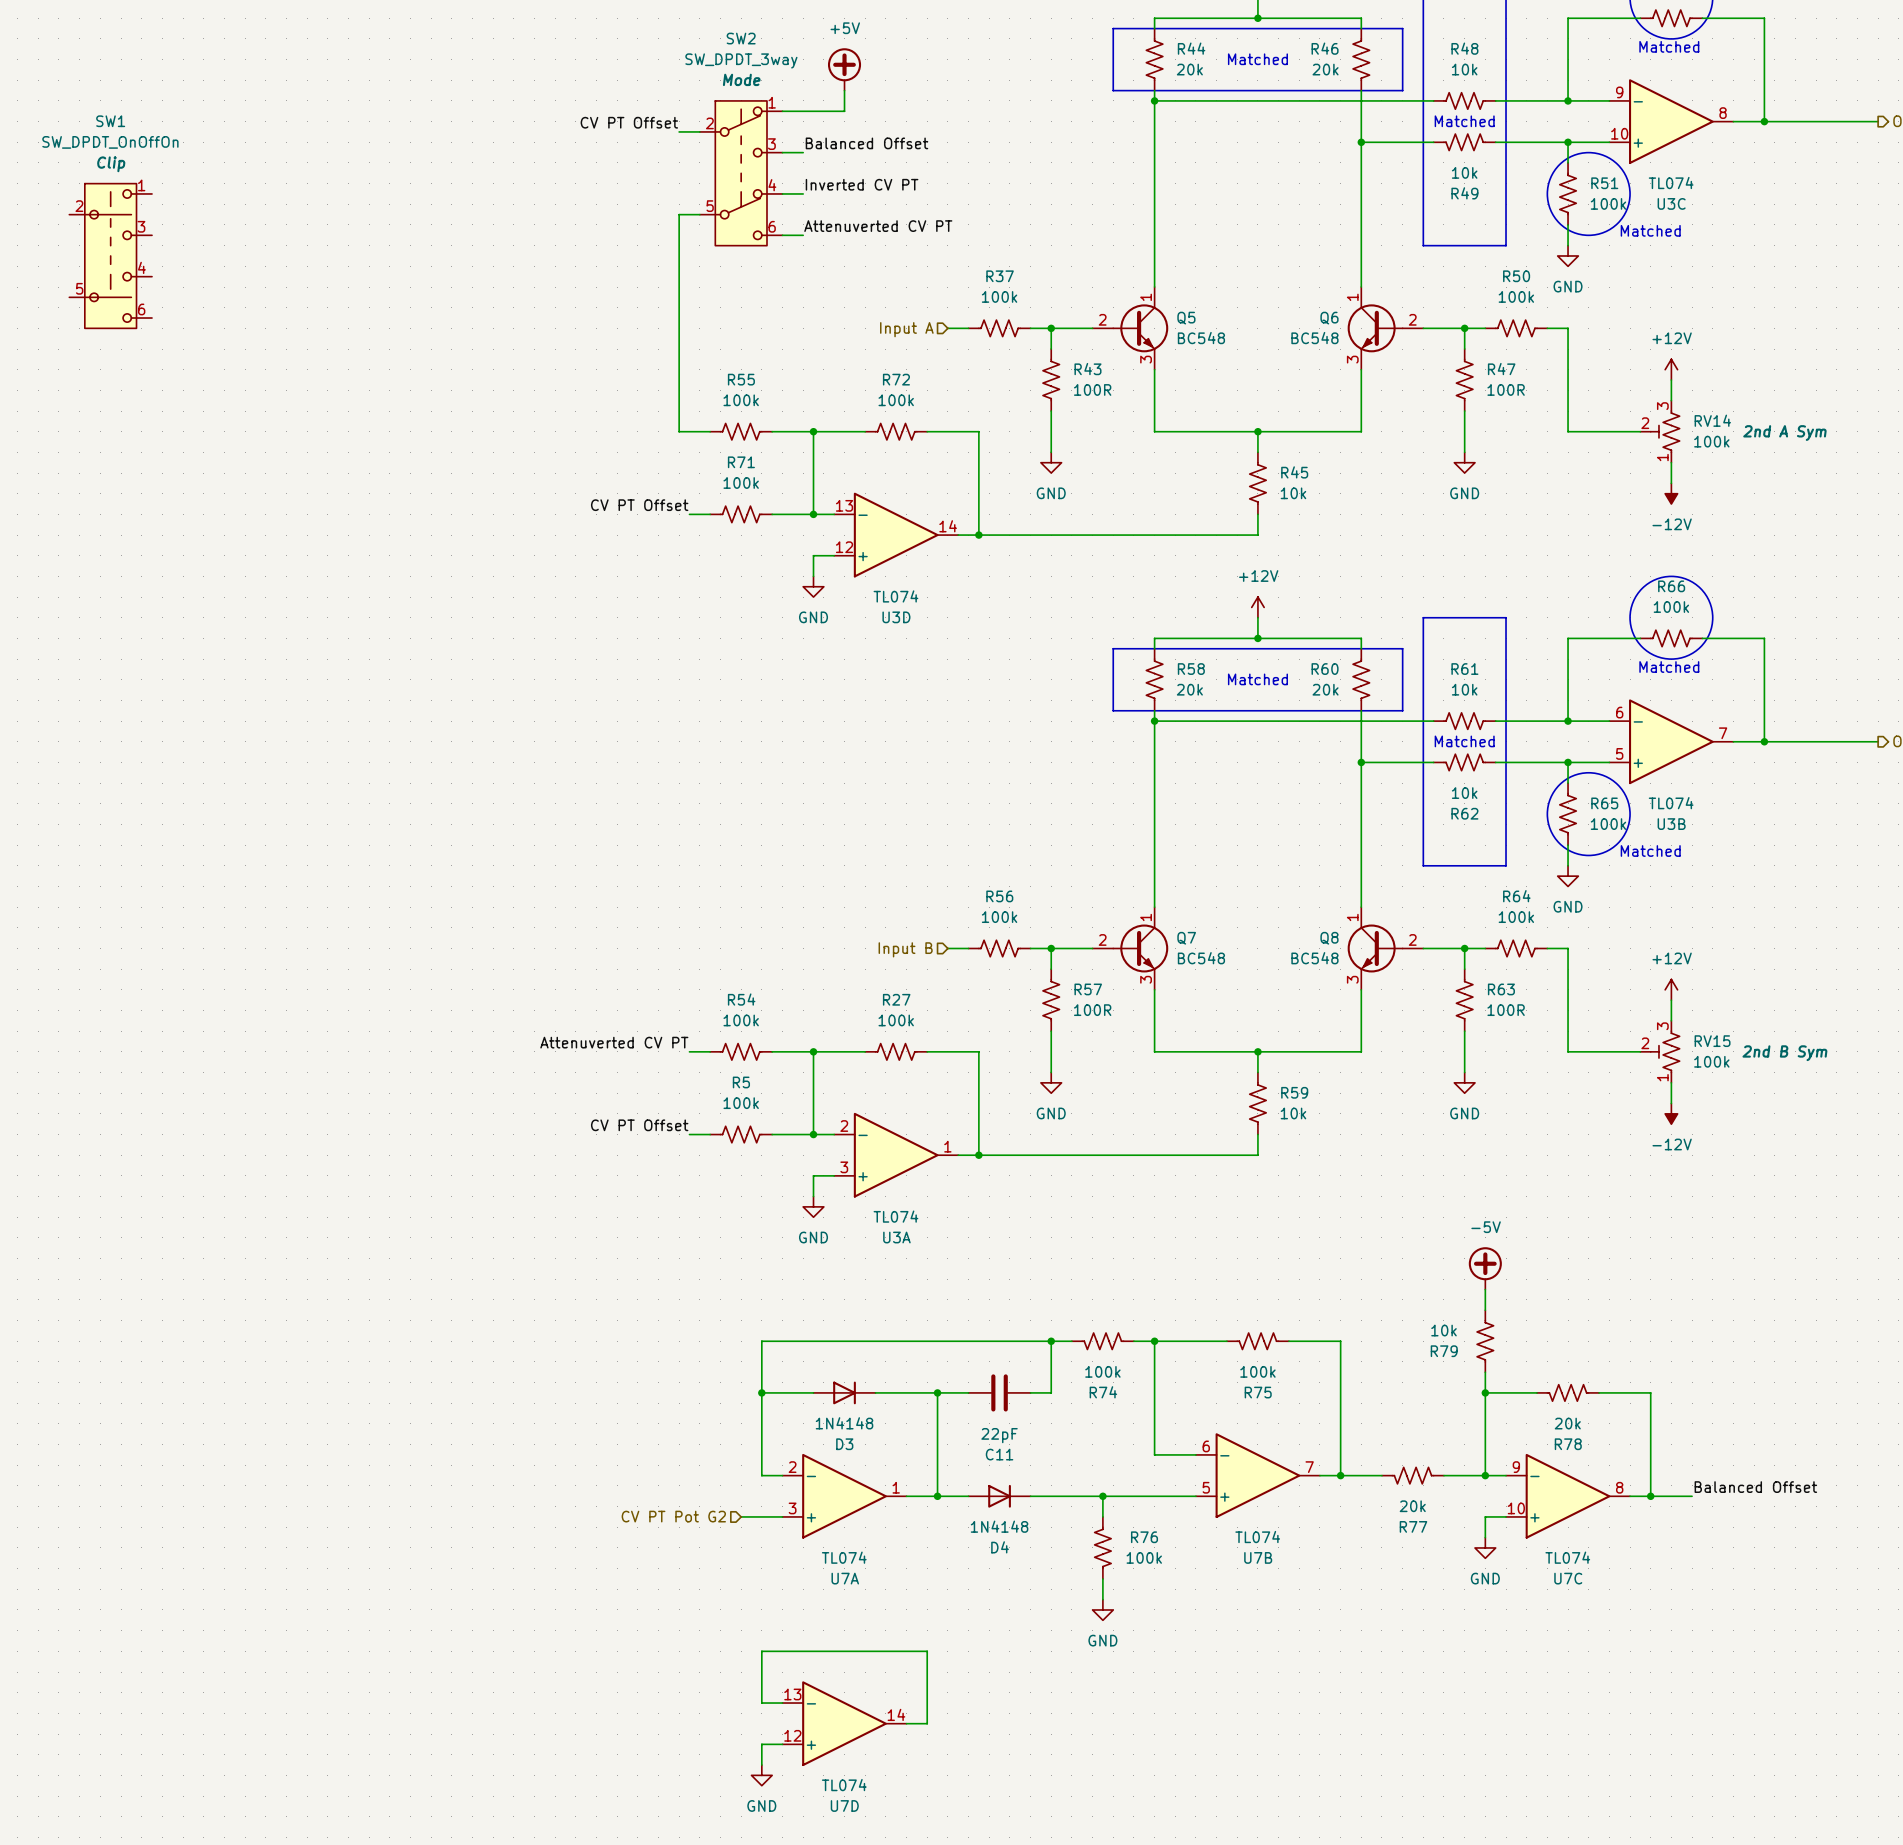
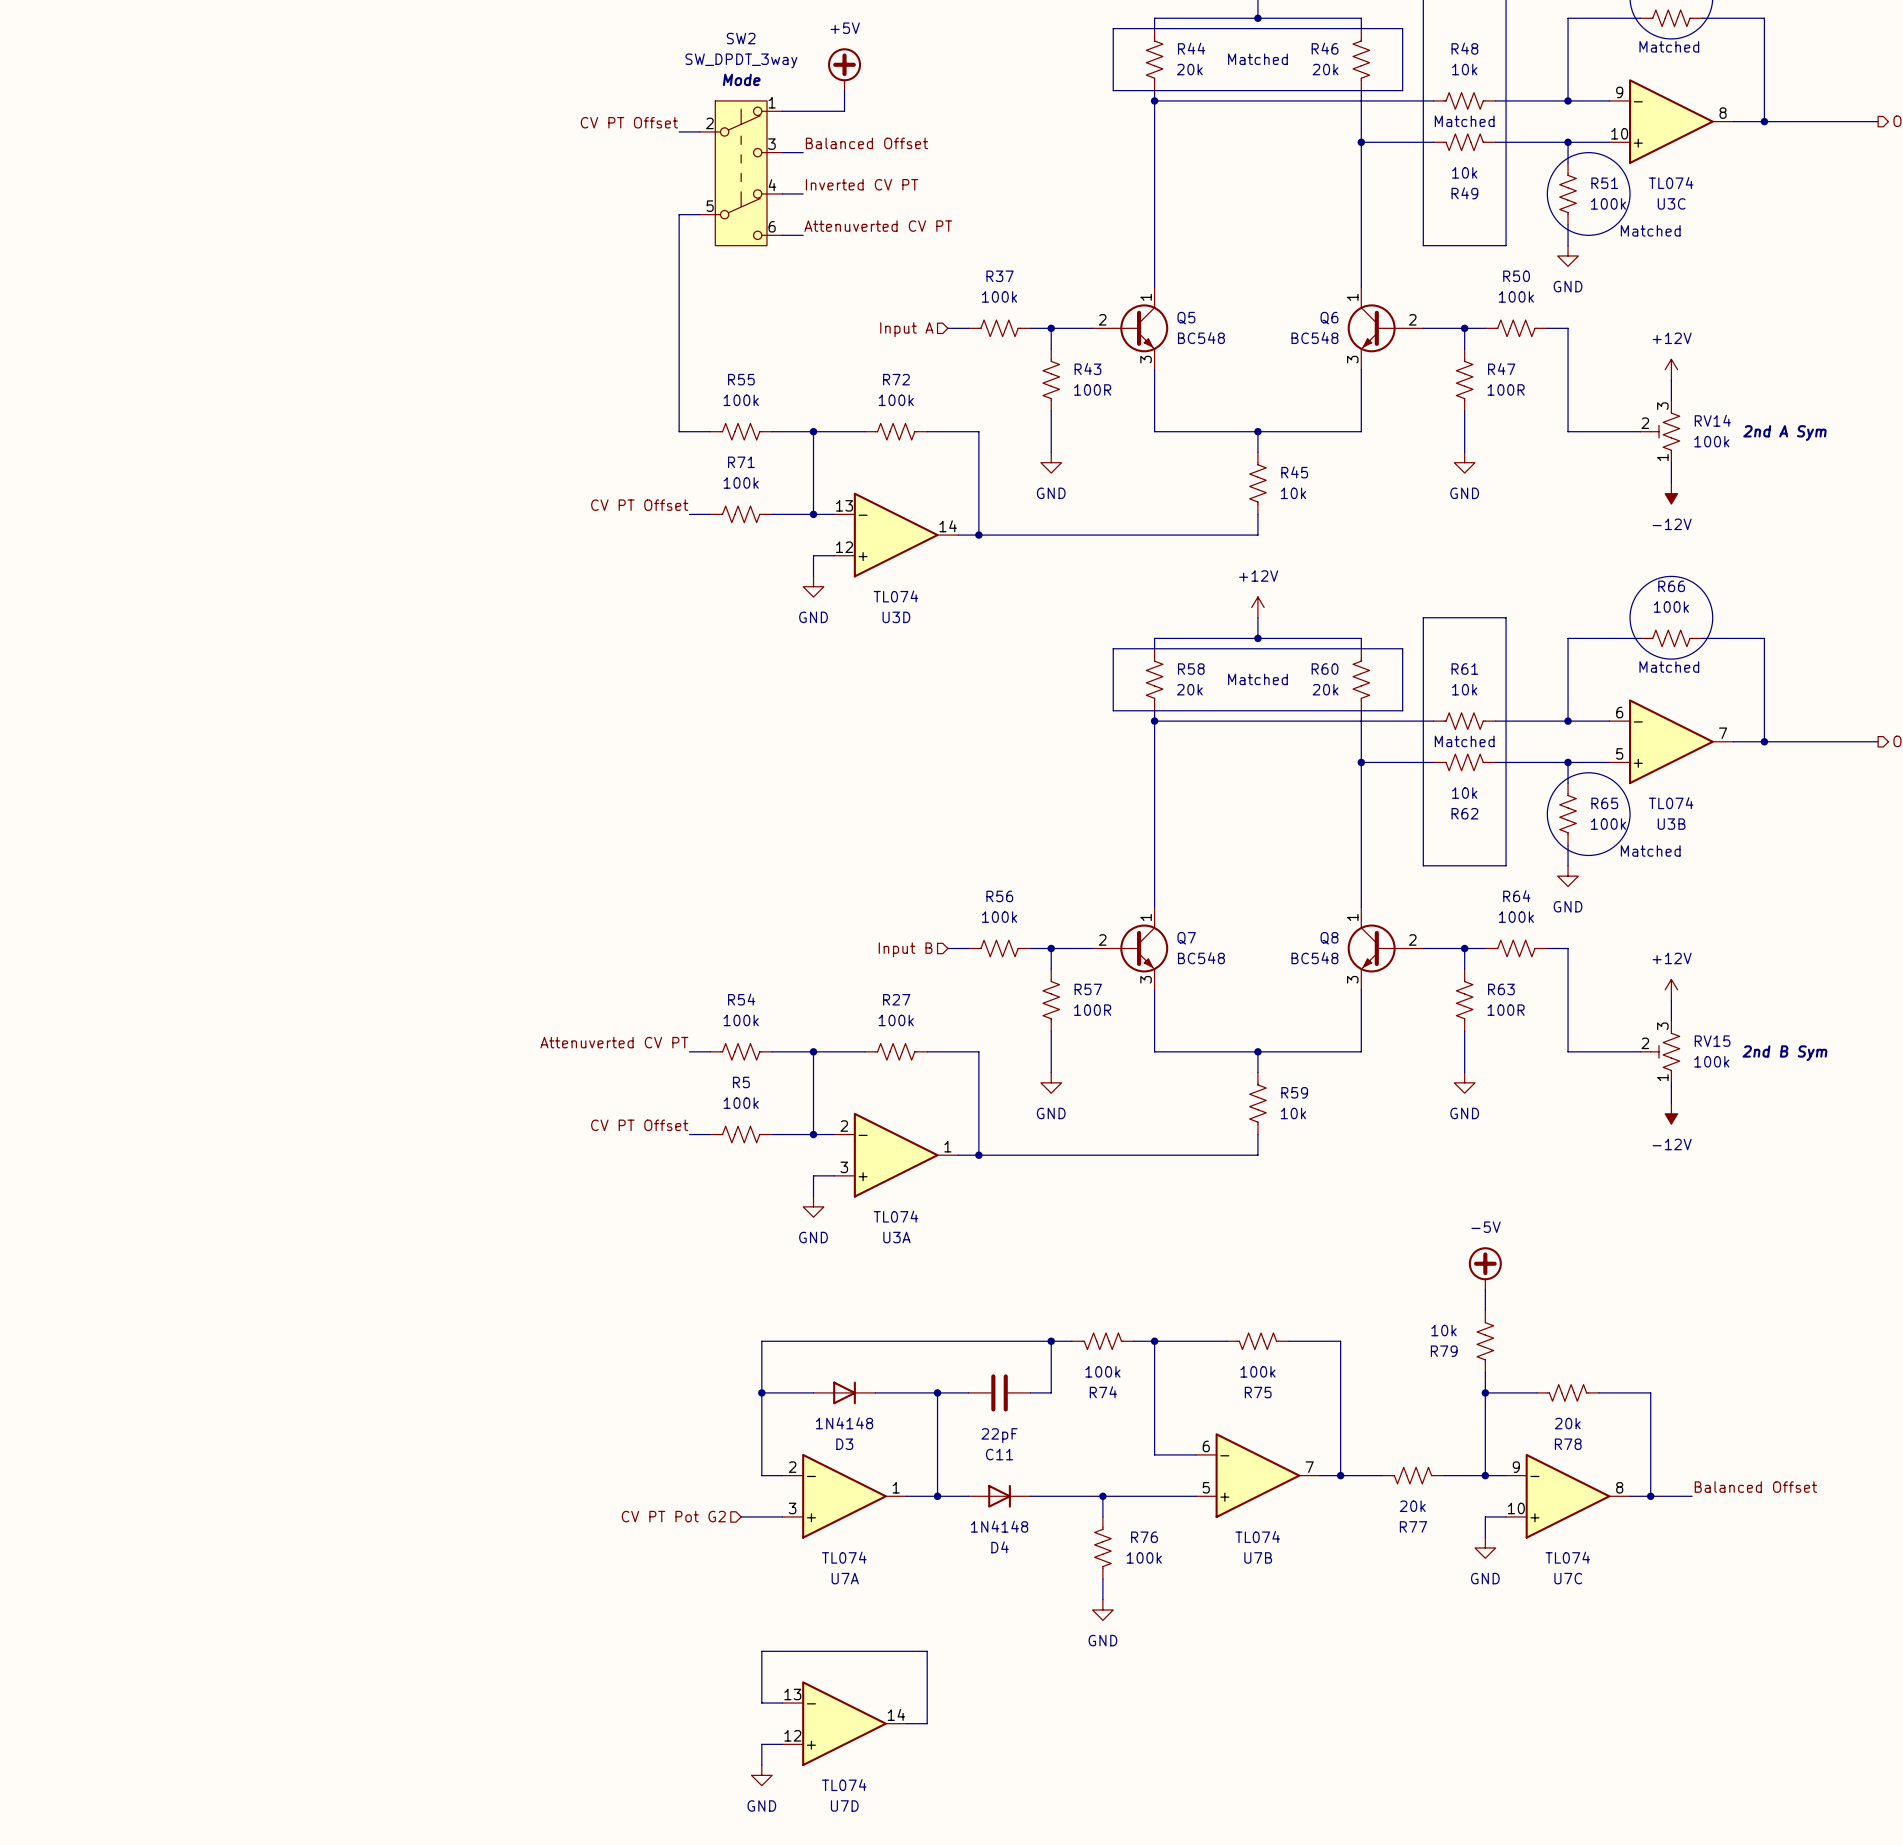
SW1: SW_DPDT_OnOffOn (110, 255) -> none

